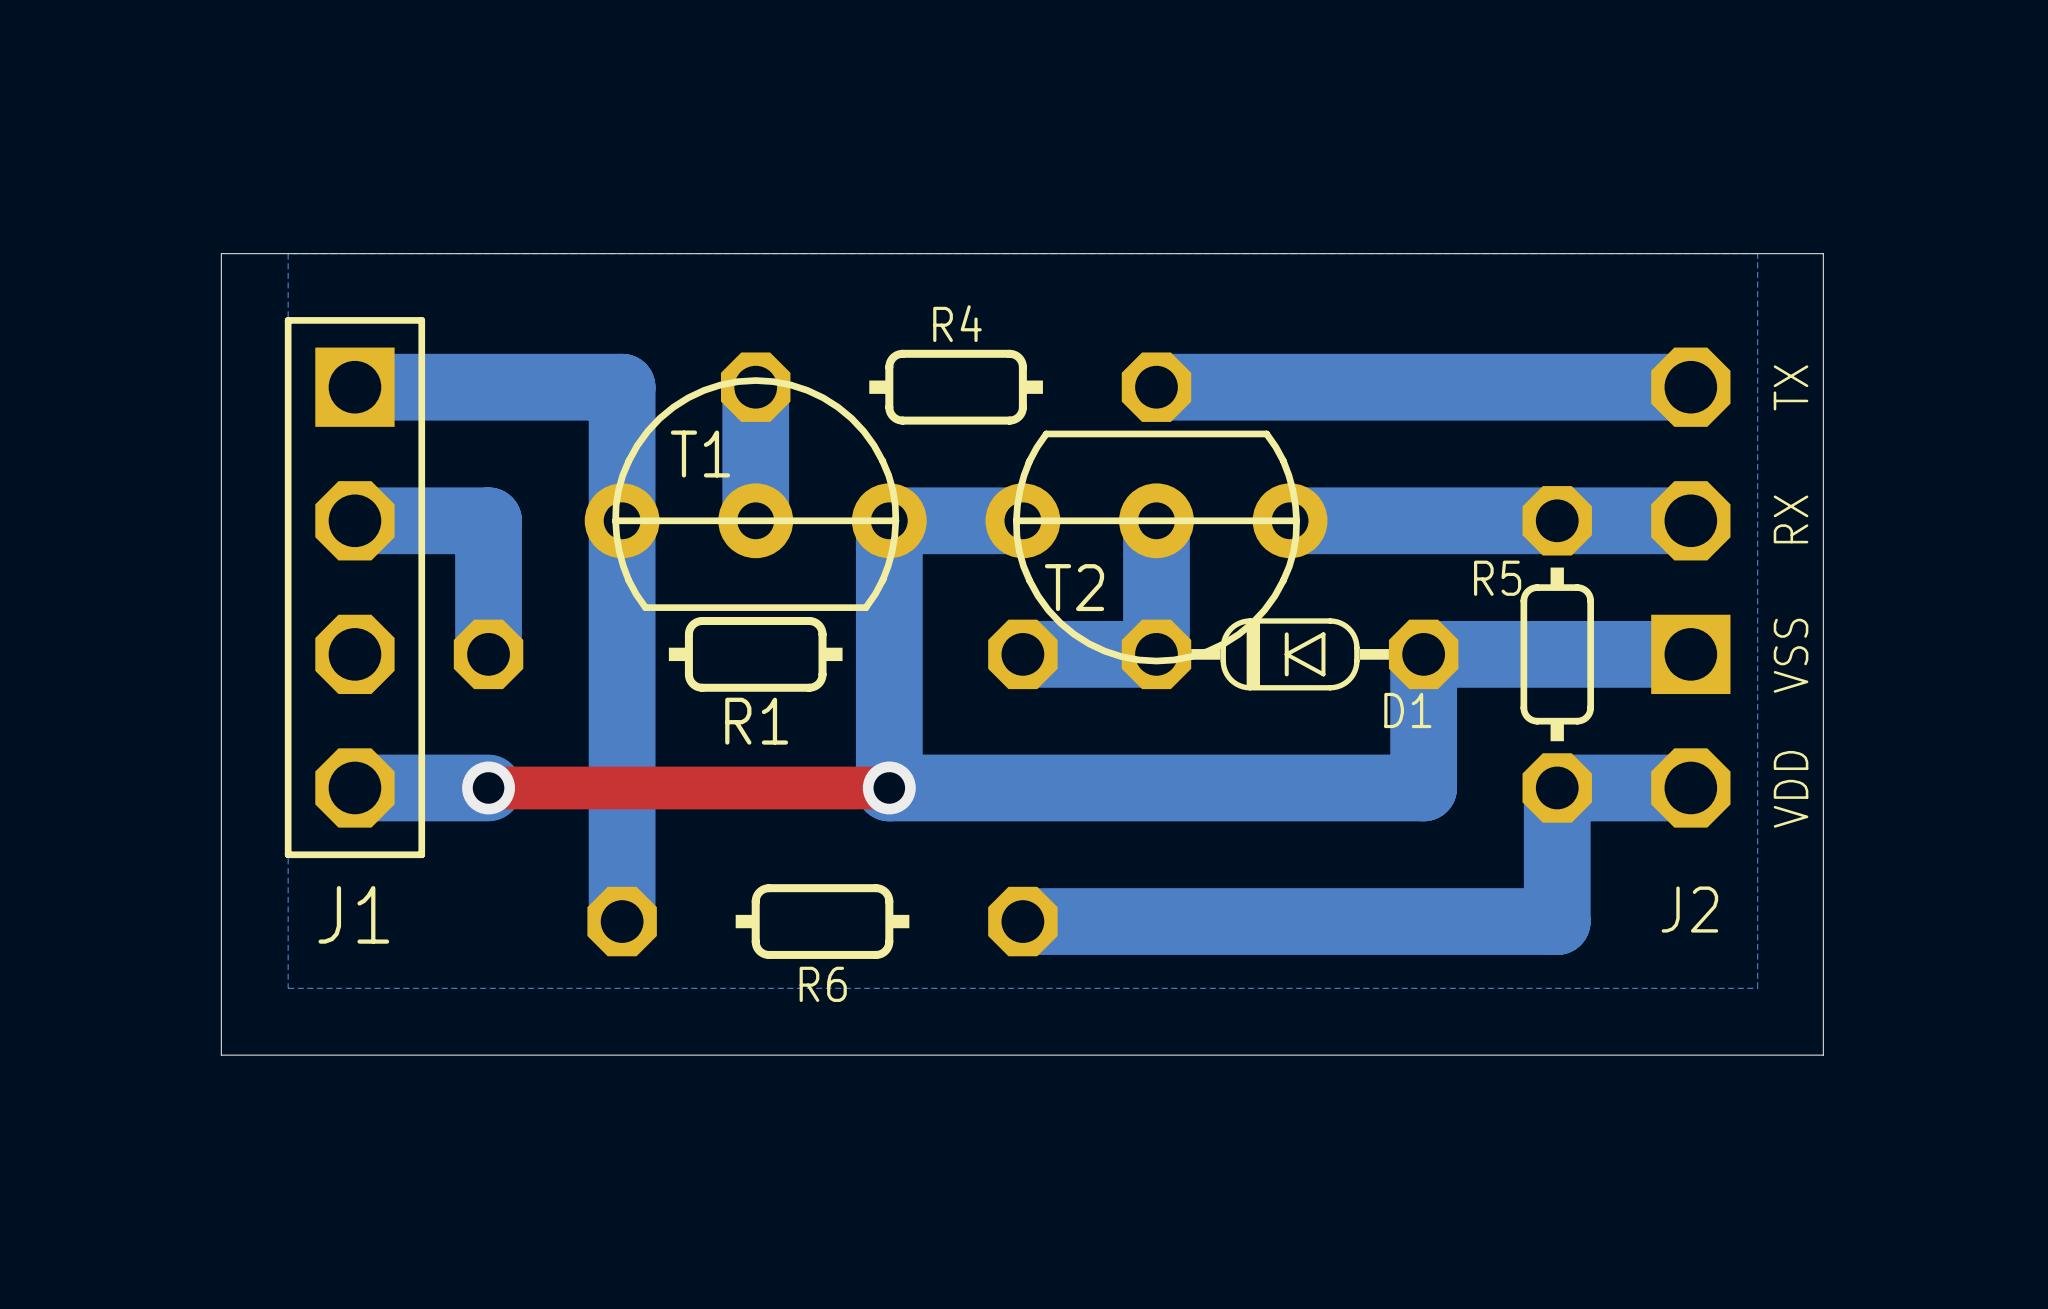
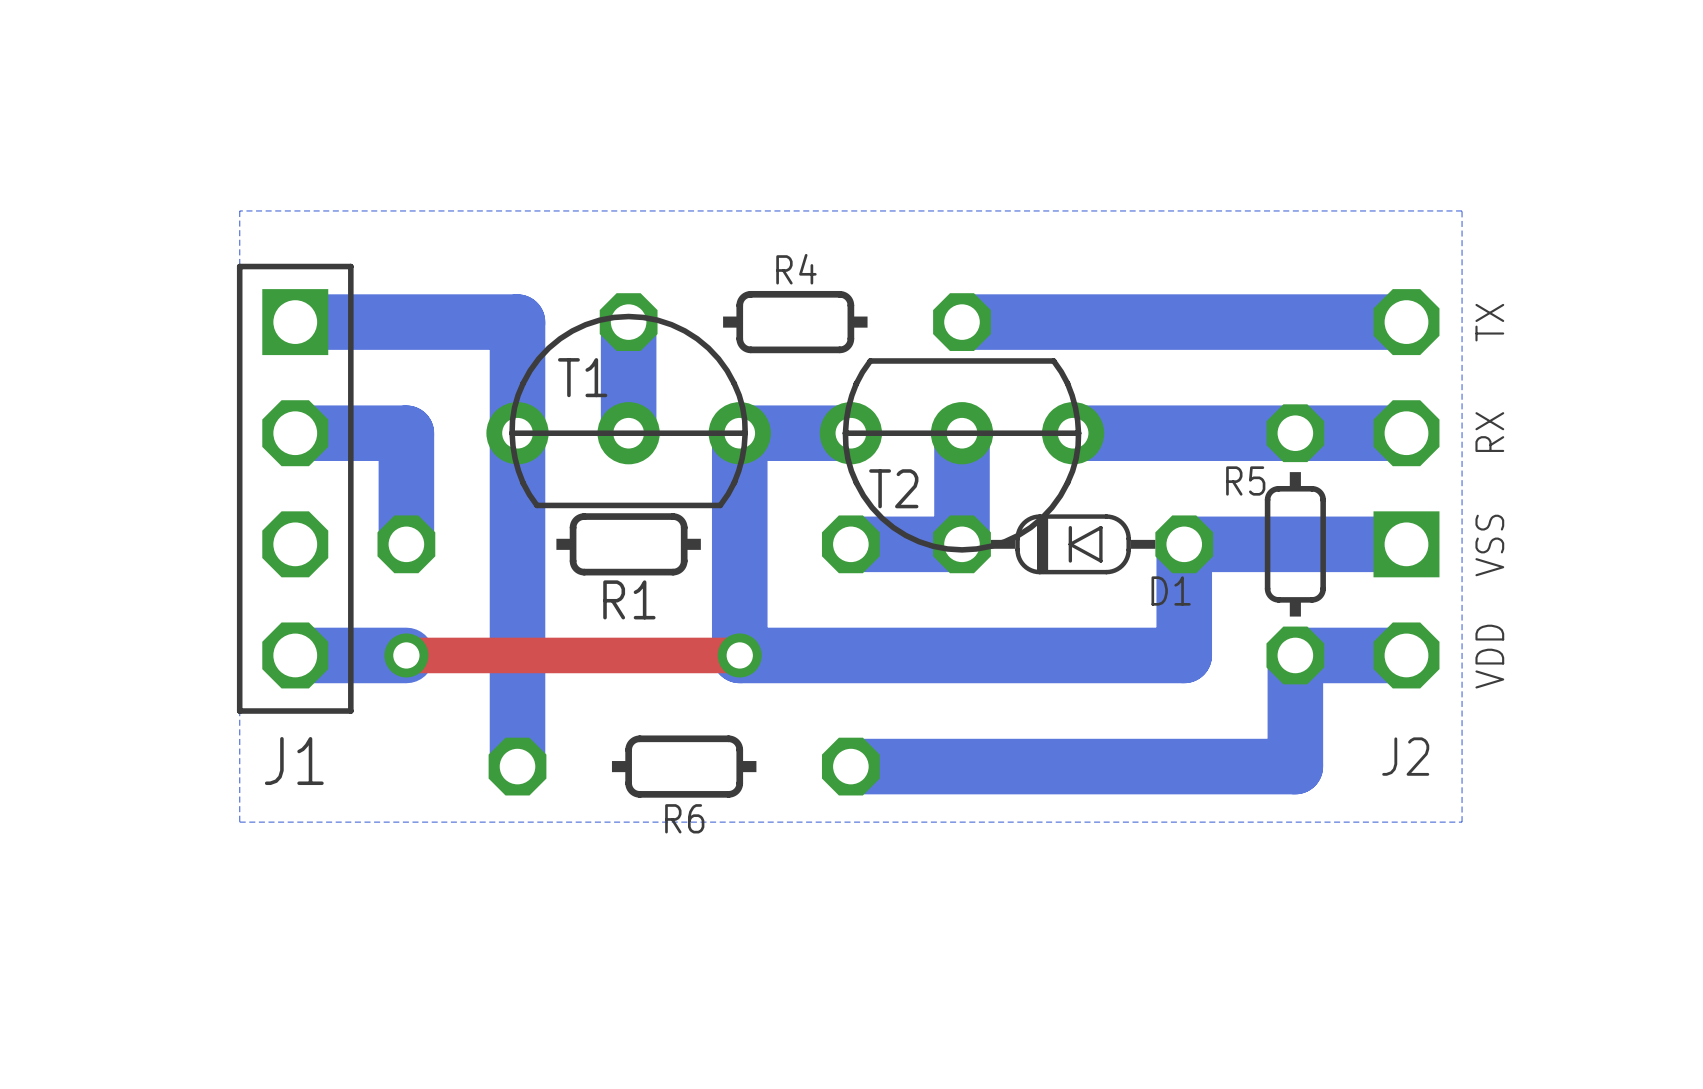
board edge: (221, 253) (1823, 253) (1823, 1055) (221, 1055) (221, 253) -> none

